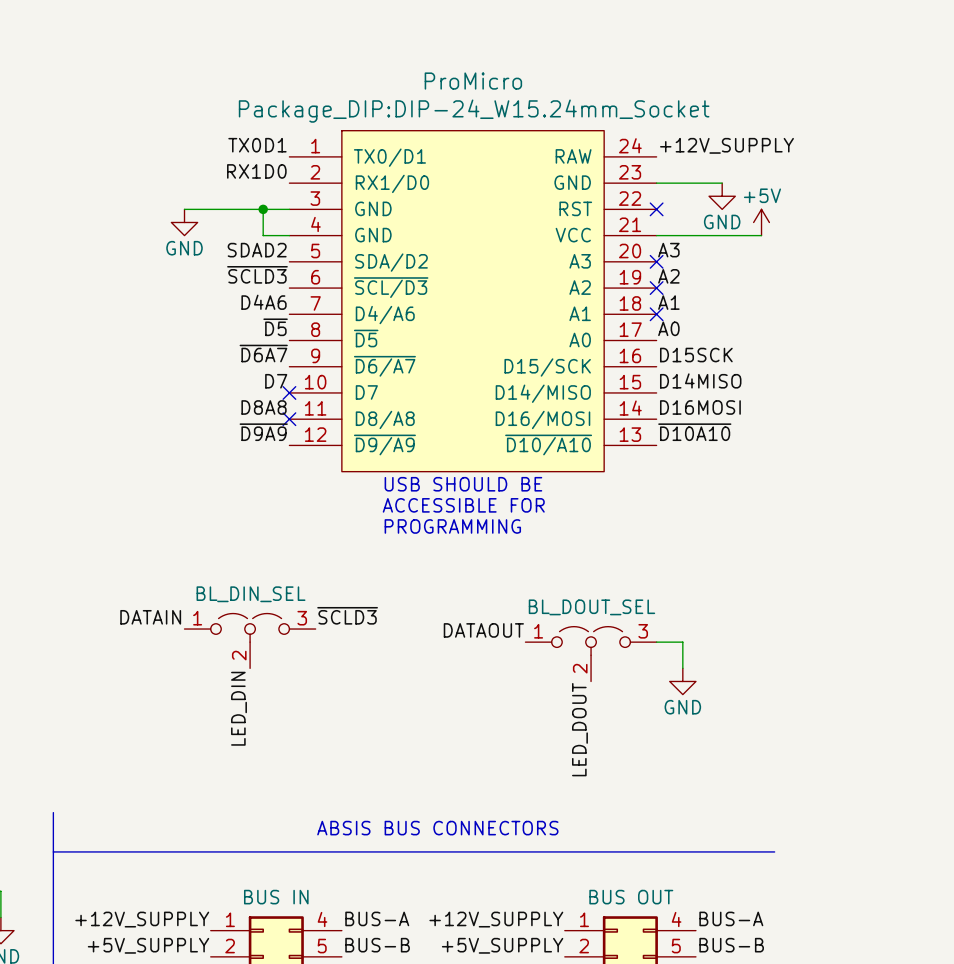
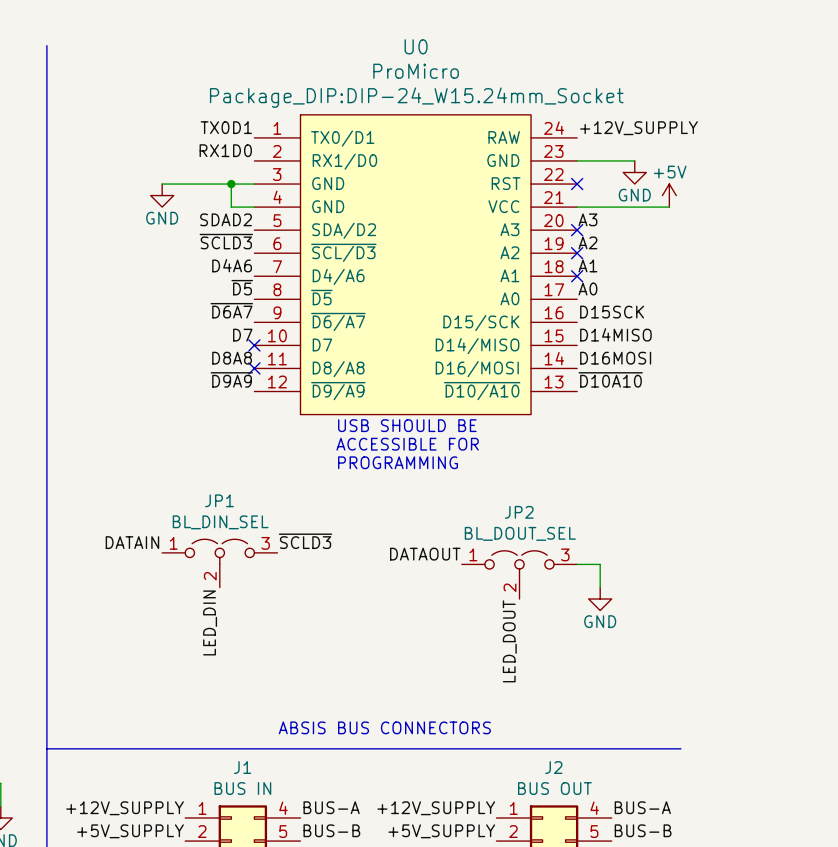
line: none -> (46, 45) (46, 714)
U0 name: none -> U0 (416, 46)
JP1 name: none -> JP1 (219, 500)
JP2 name: none -> JP2 (519, 512)
J1 name: none -> J1 (242, 767)
J2 name: none -> J2 (553, 767)

